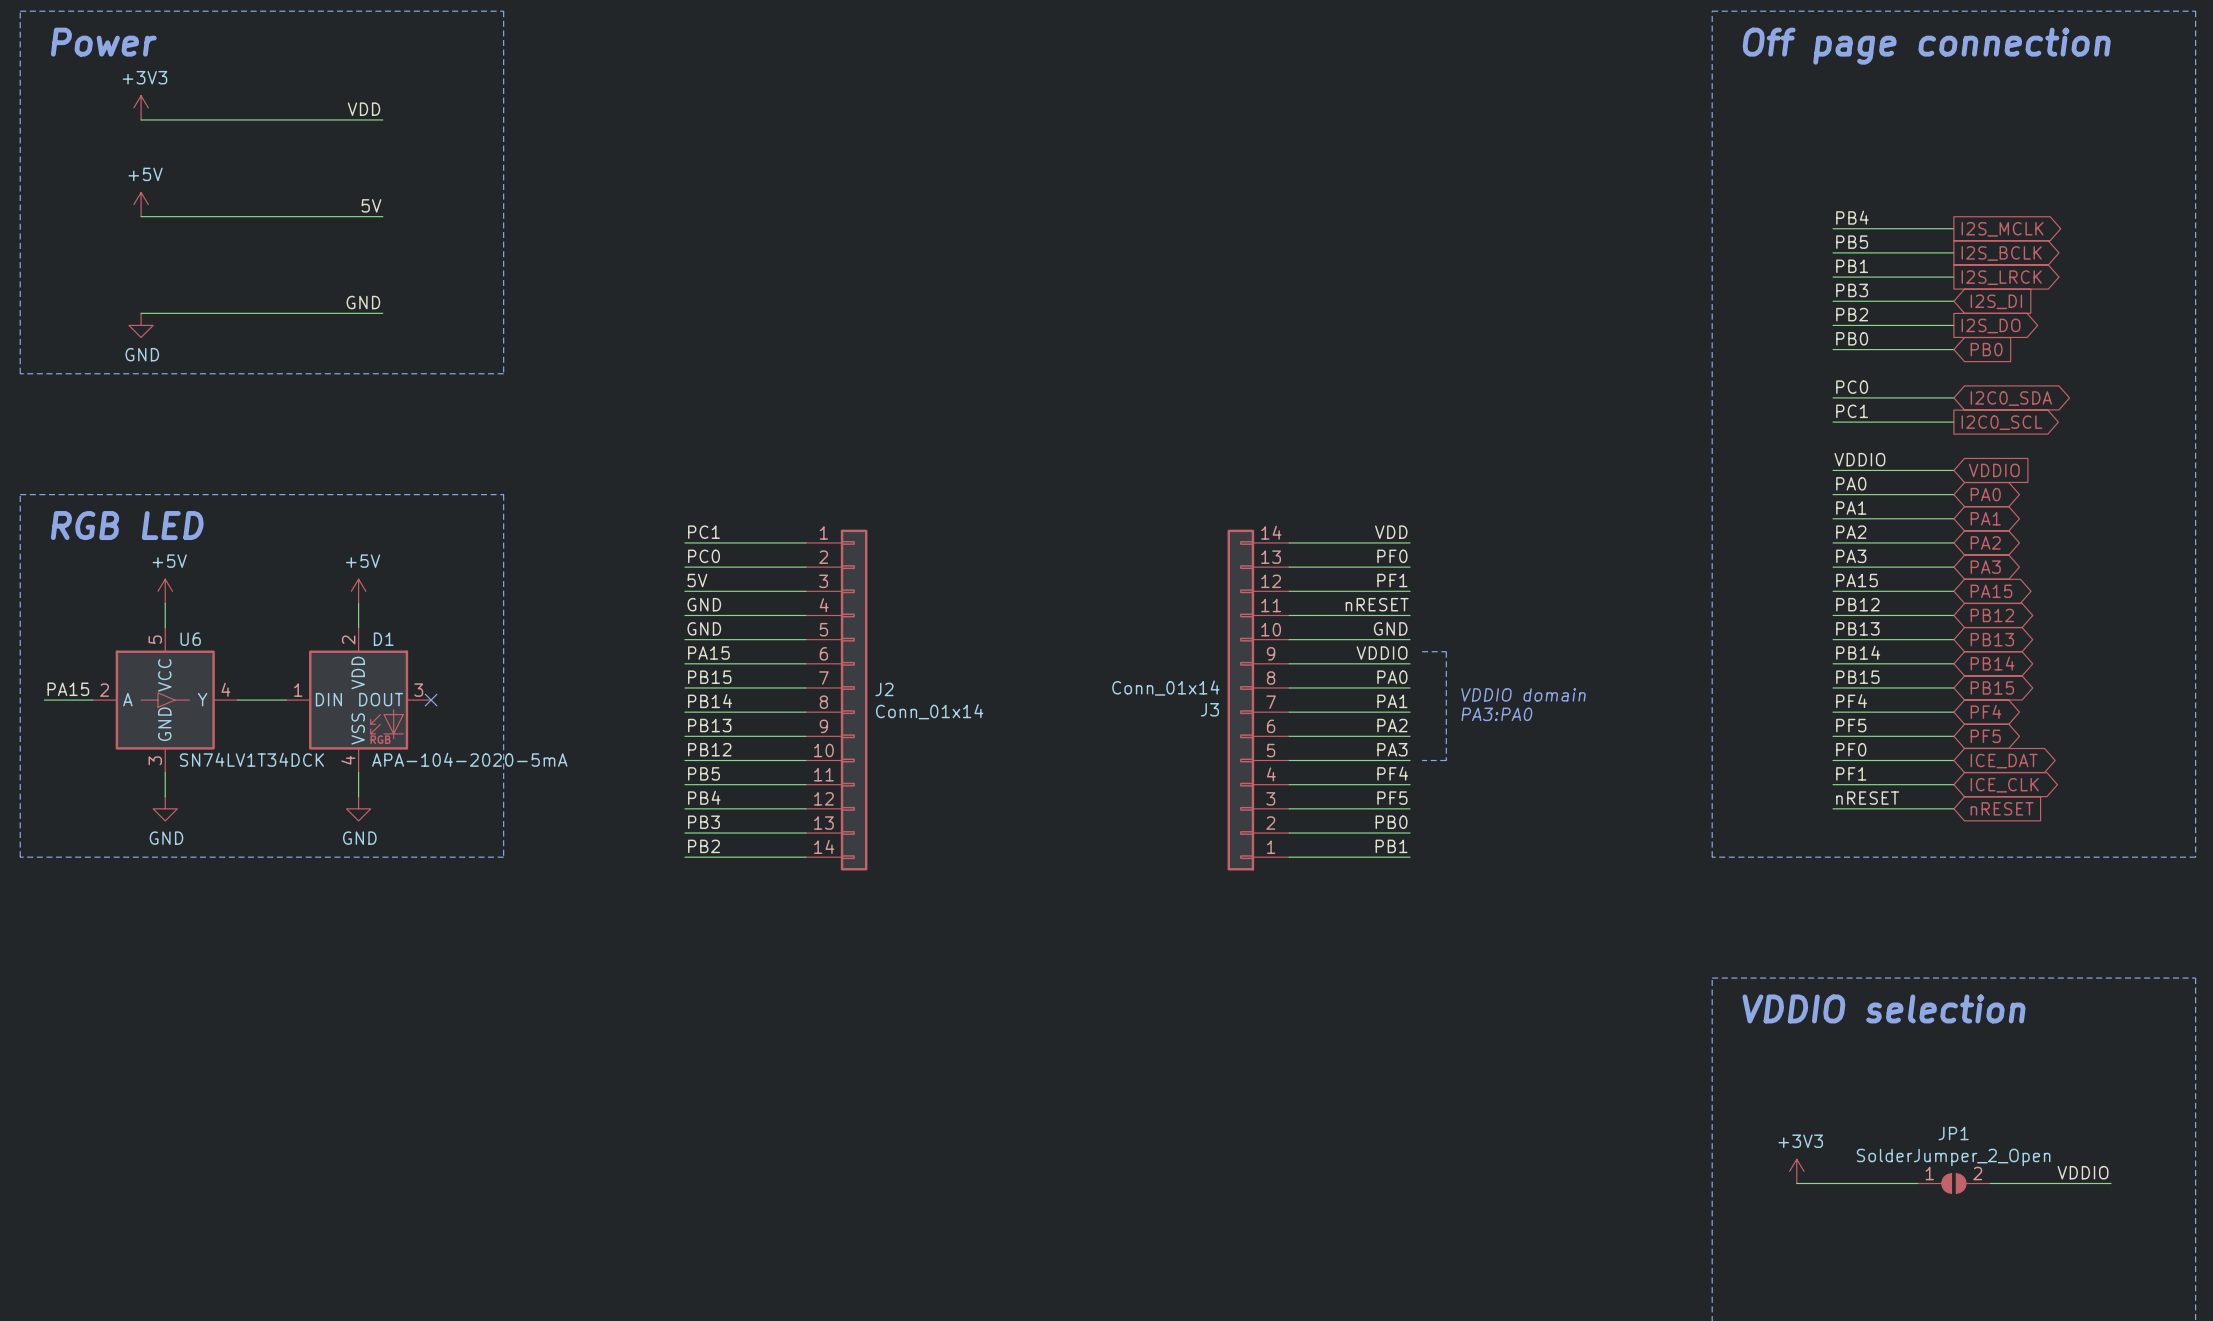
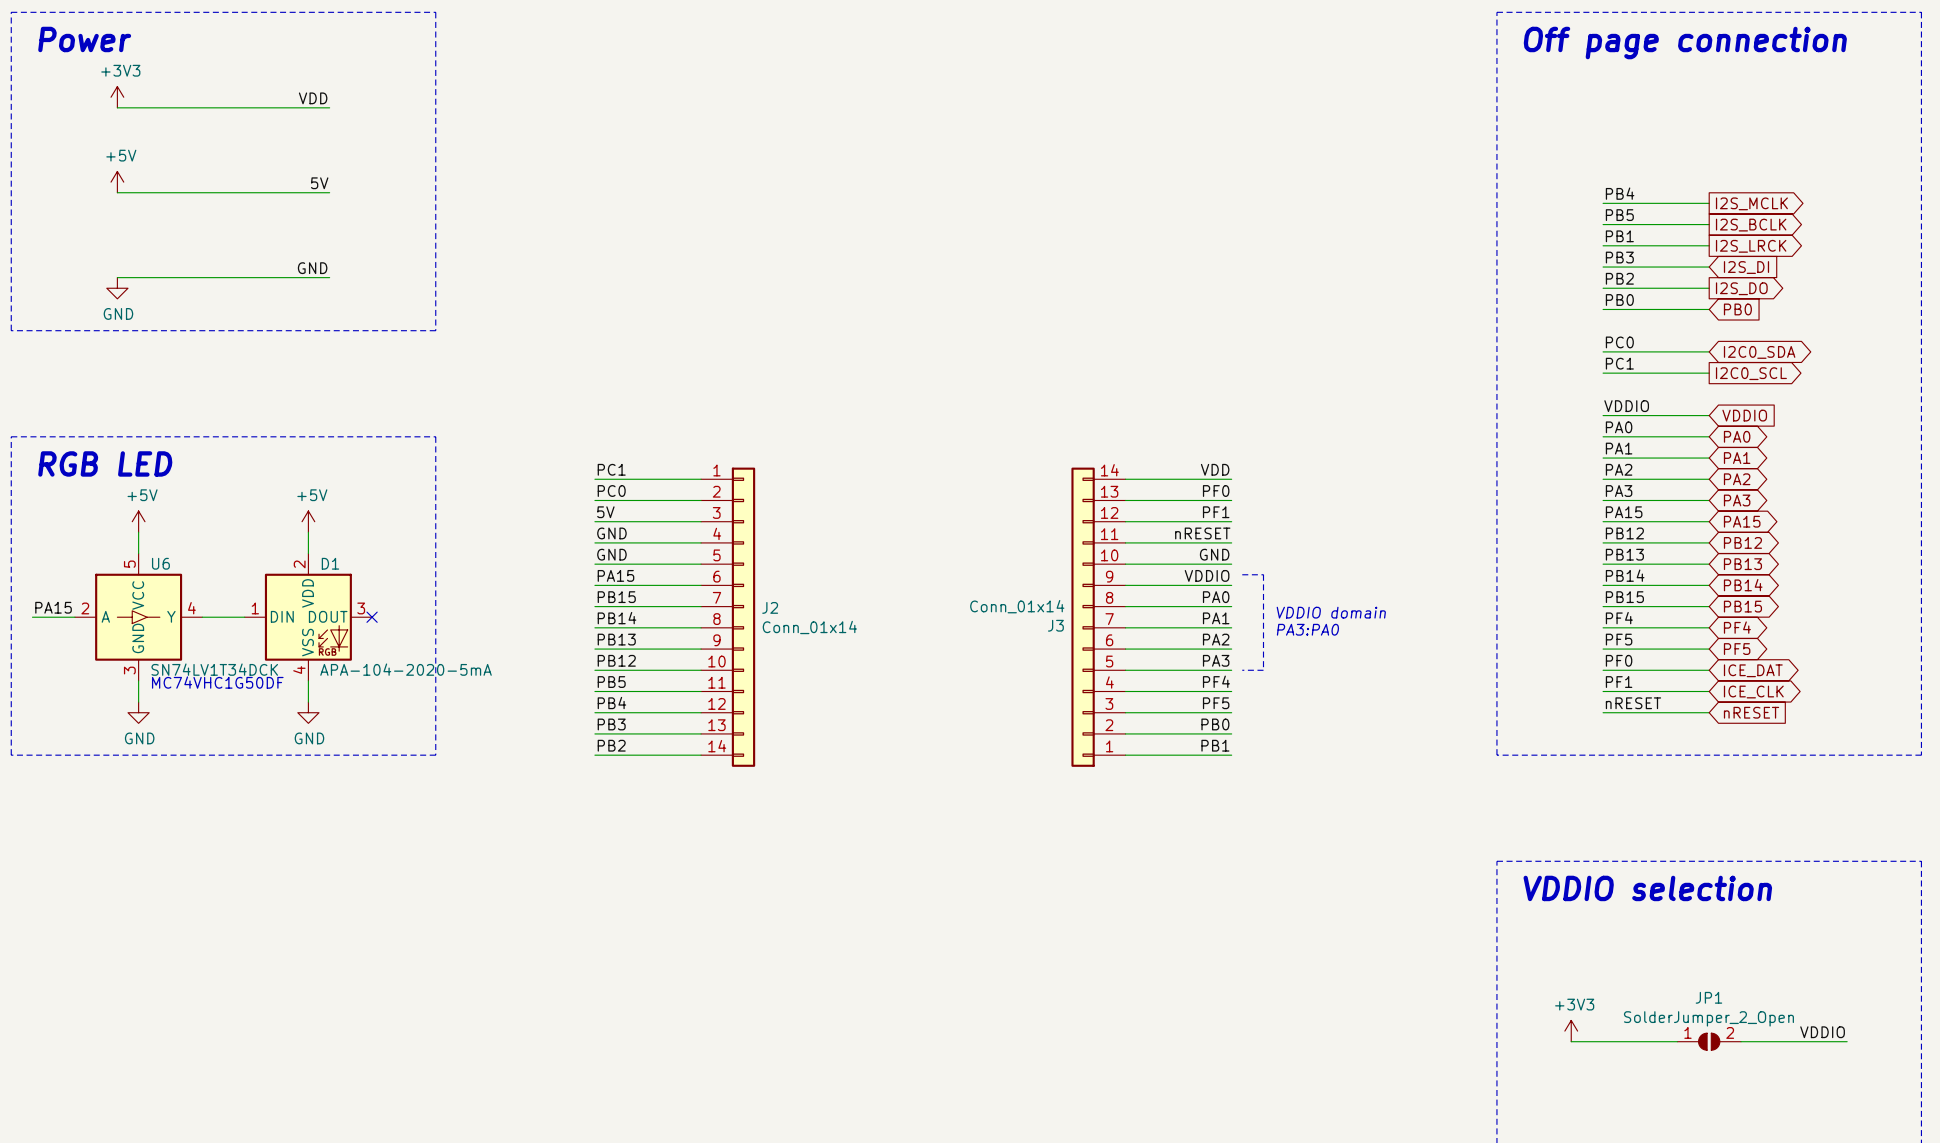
text: none -> MC74VHC1G50DF (217, 682)

